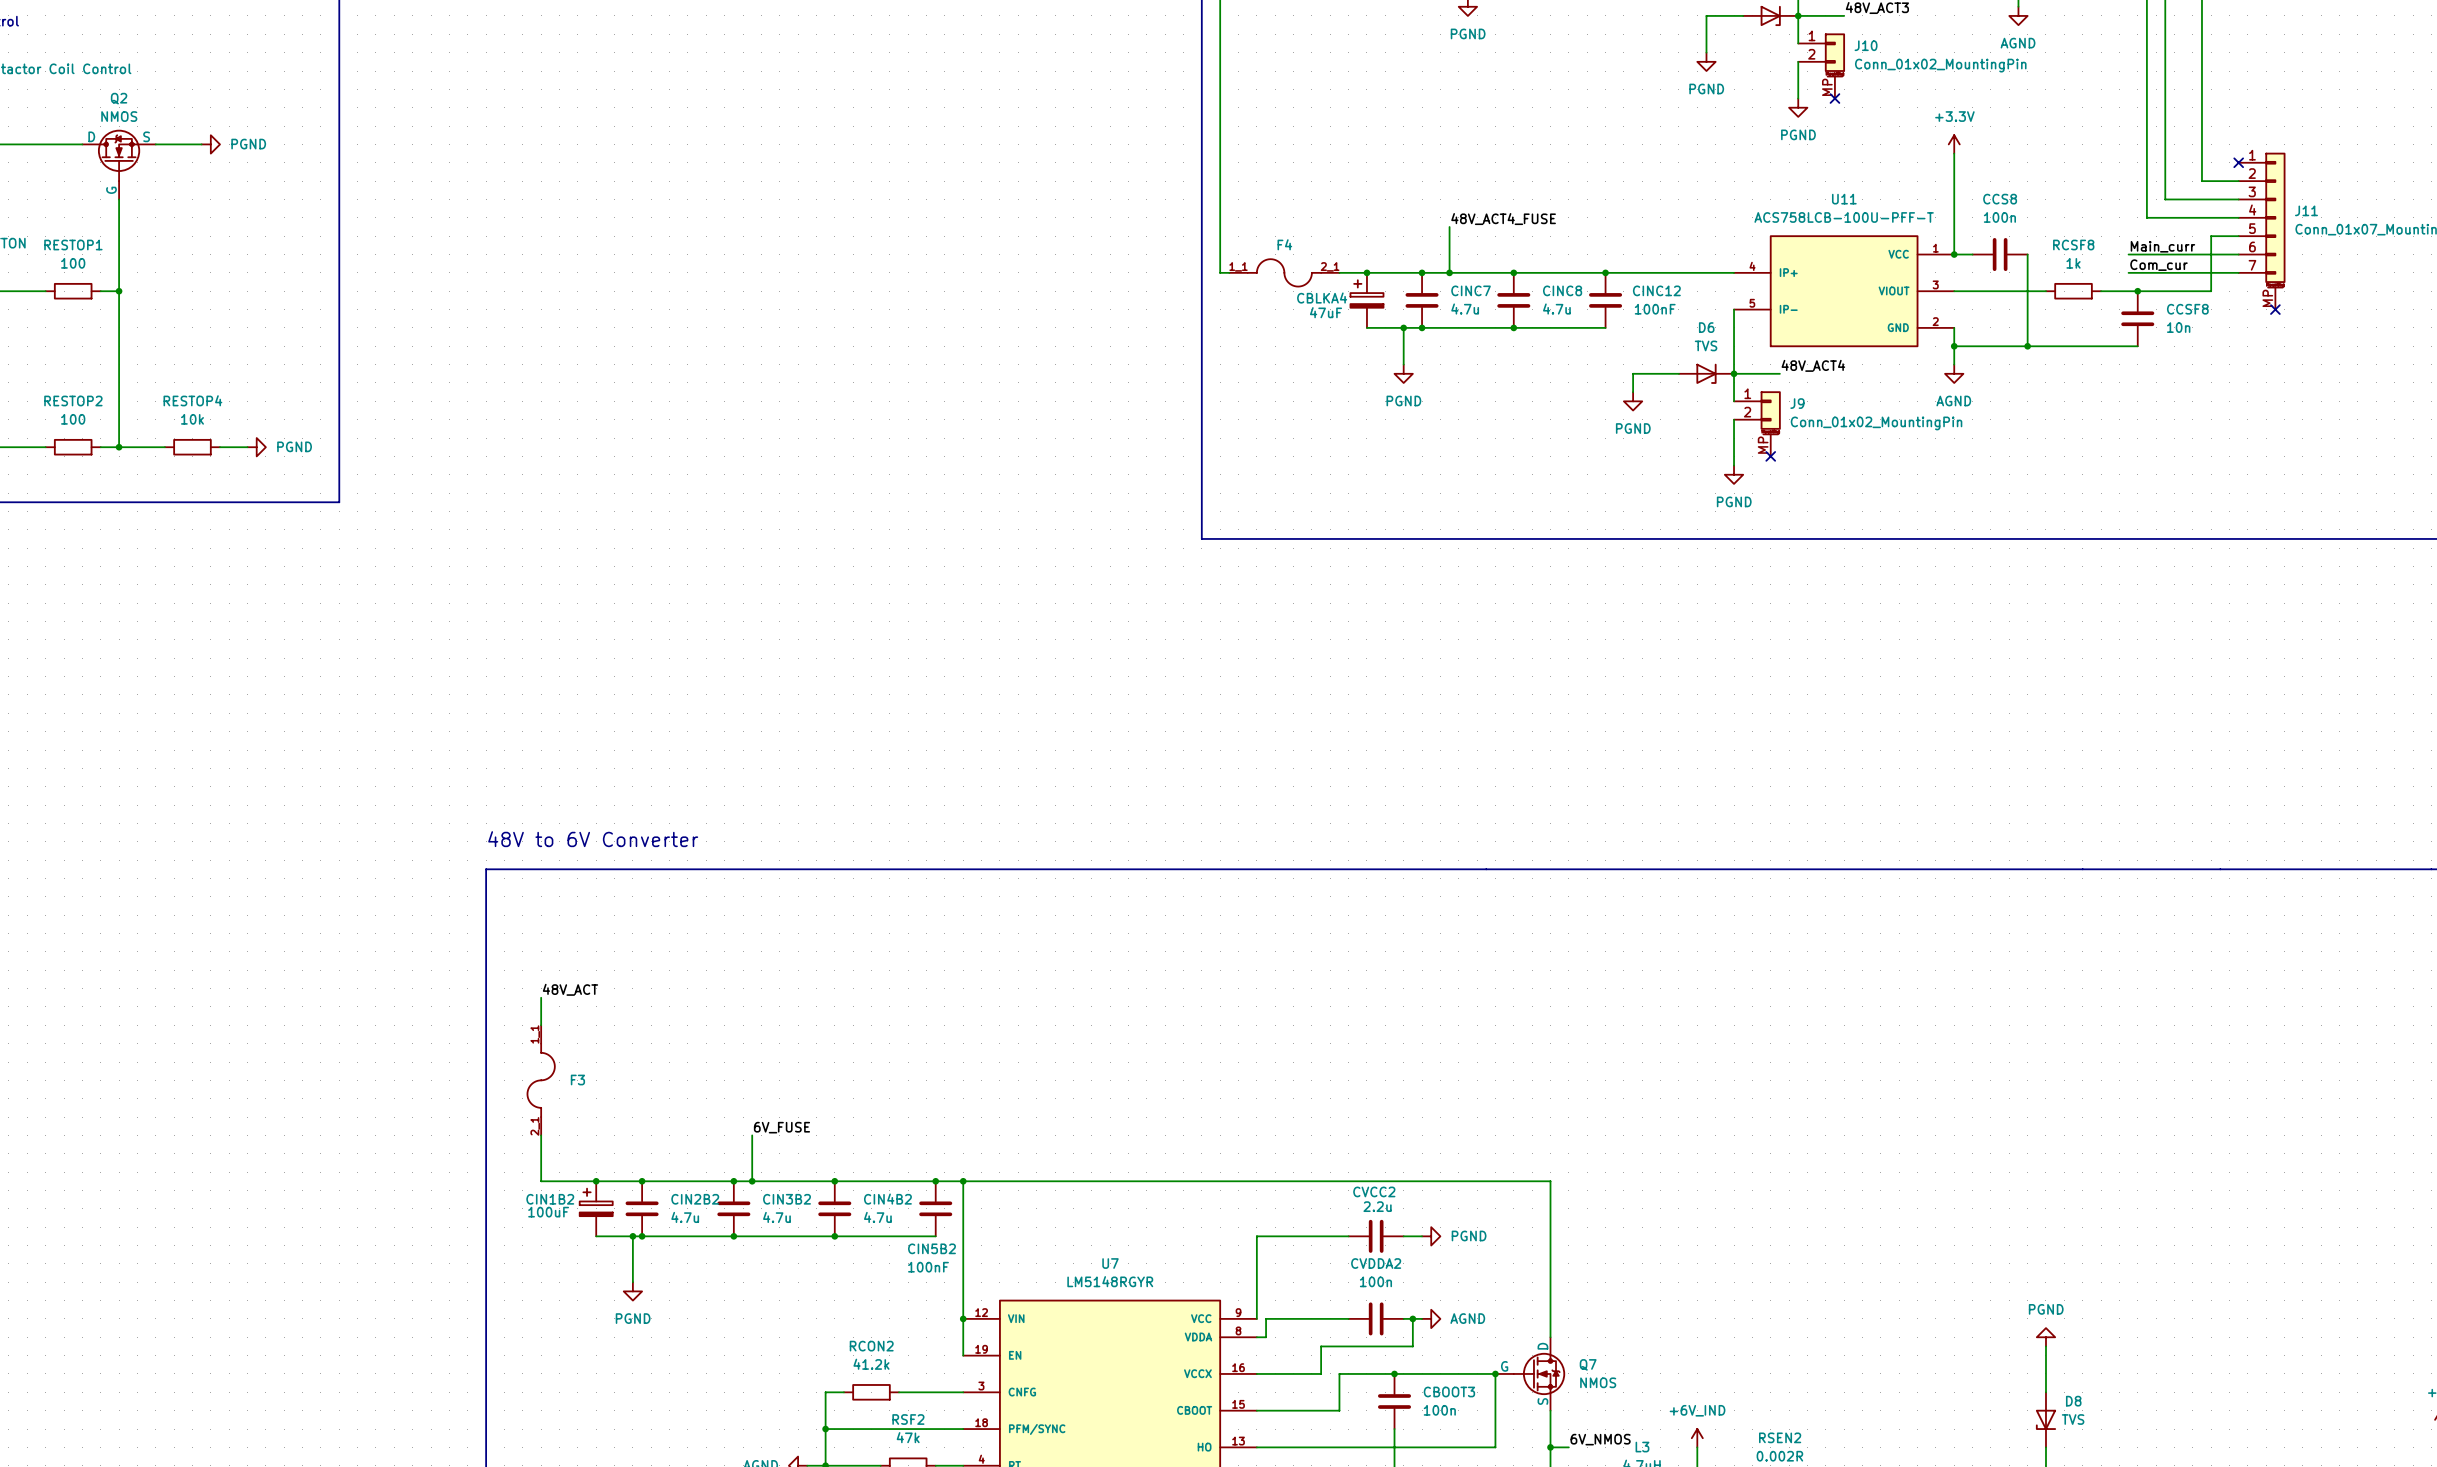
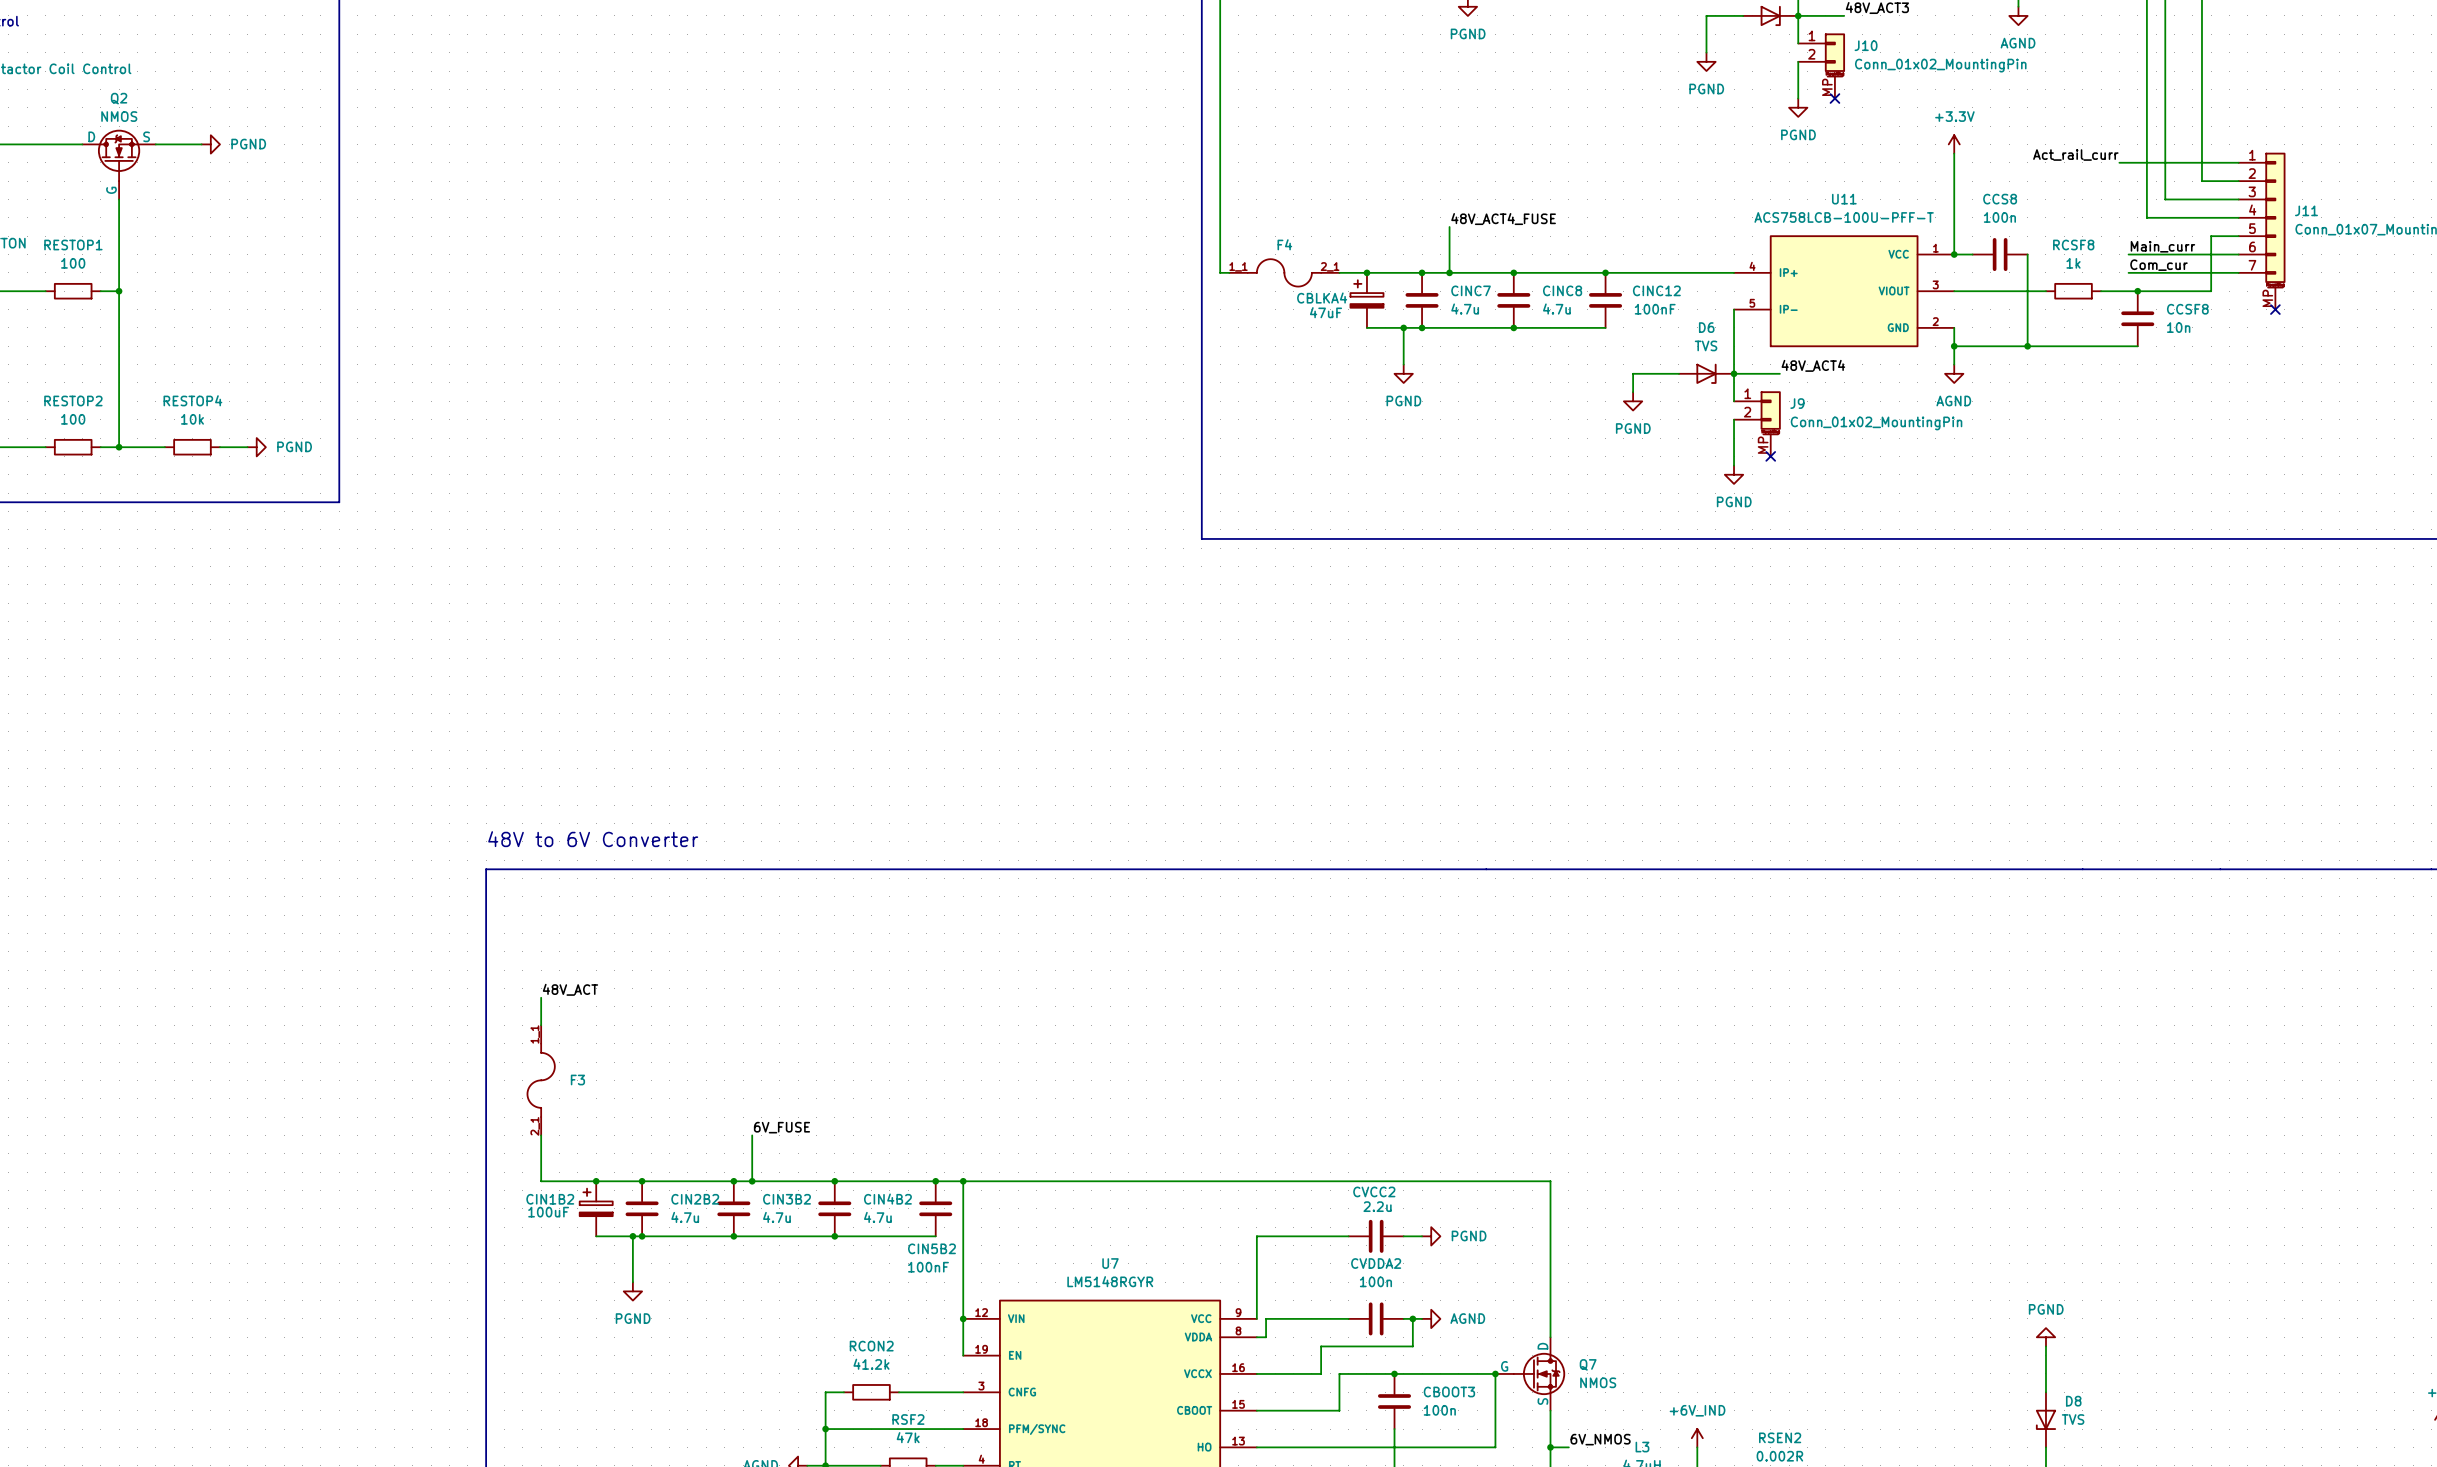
label: none -> Act_rail_curr (2075, 155)
wire: none -> (2119, 162) (2238, 162)
no-connect mark: (2238, 162) -> none

